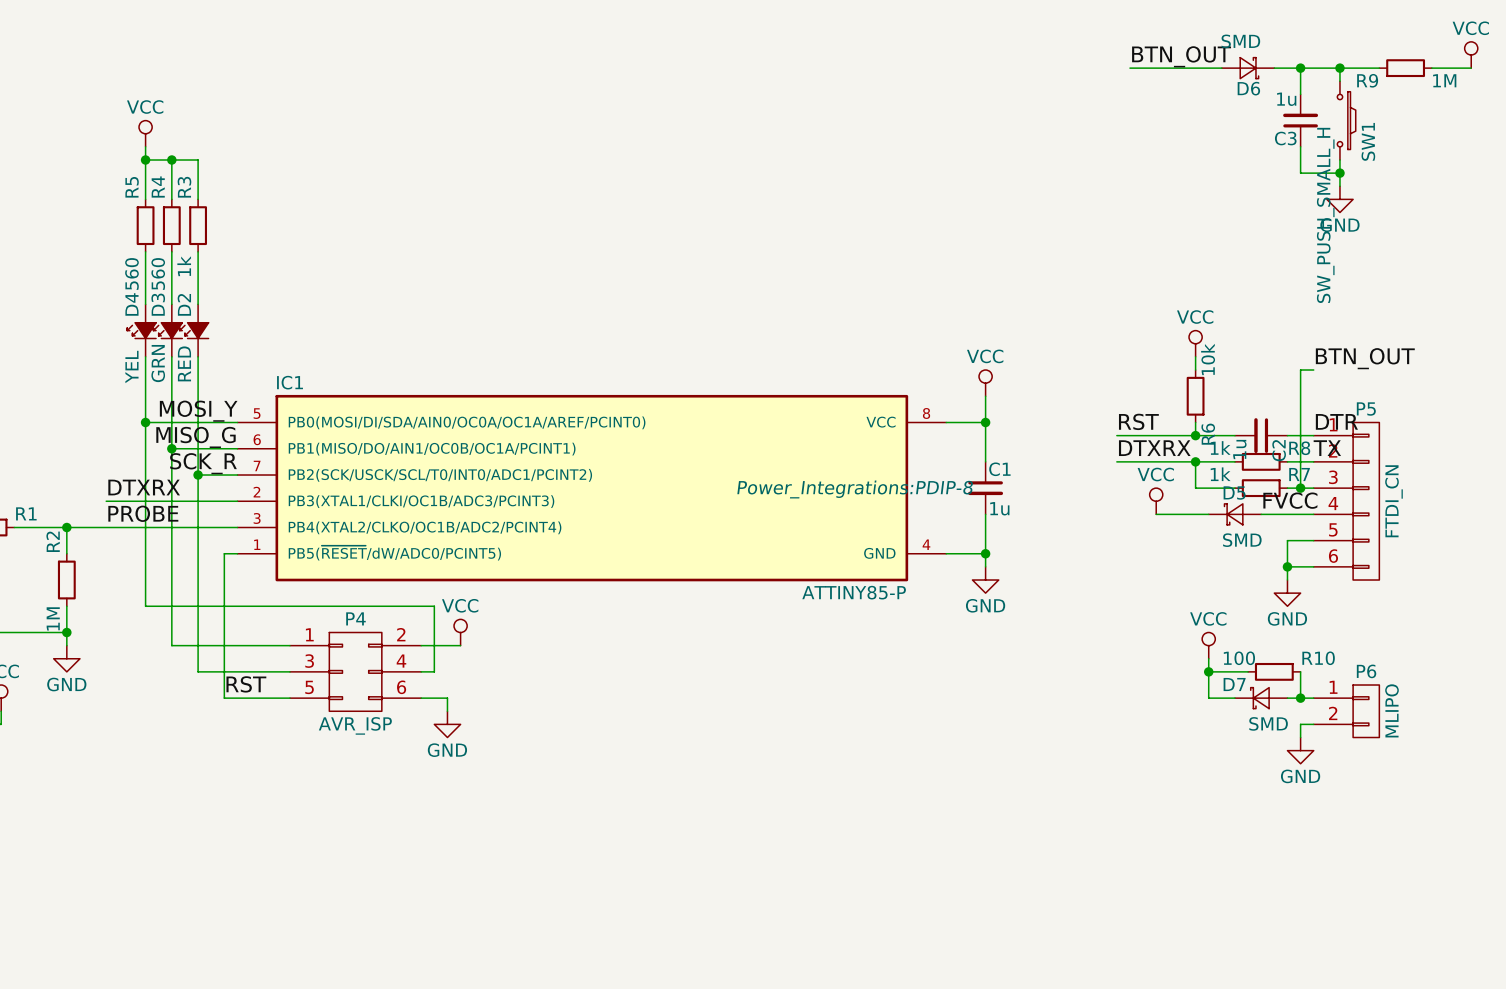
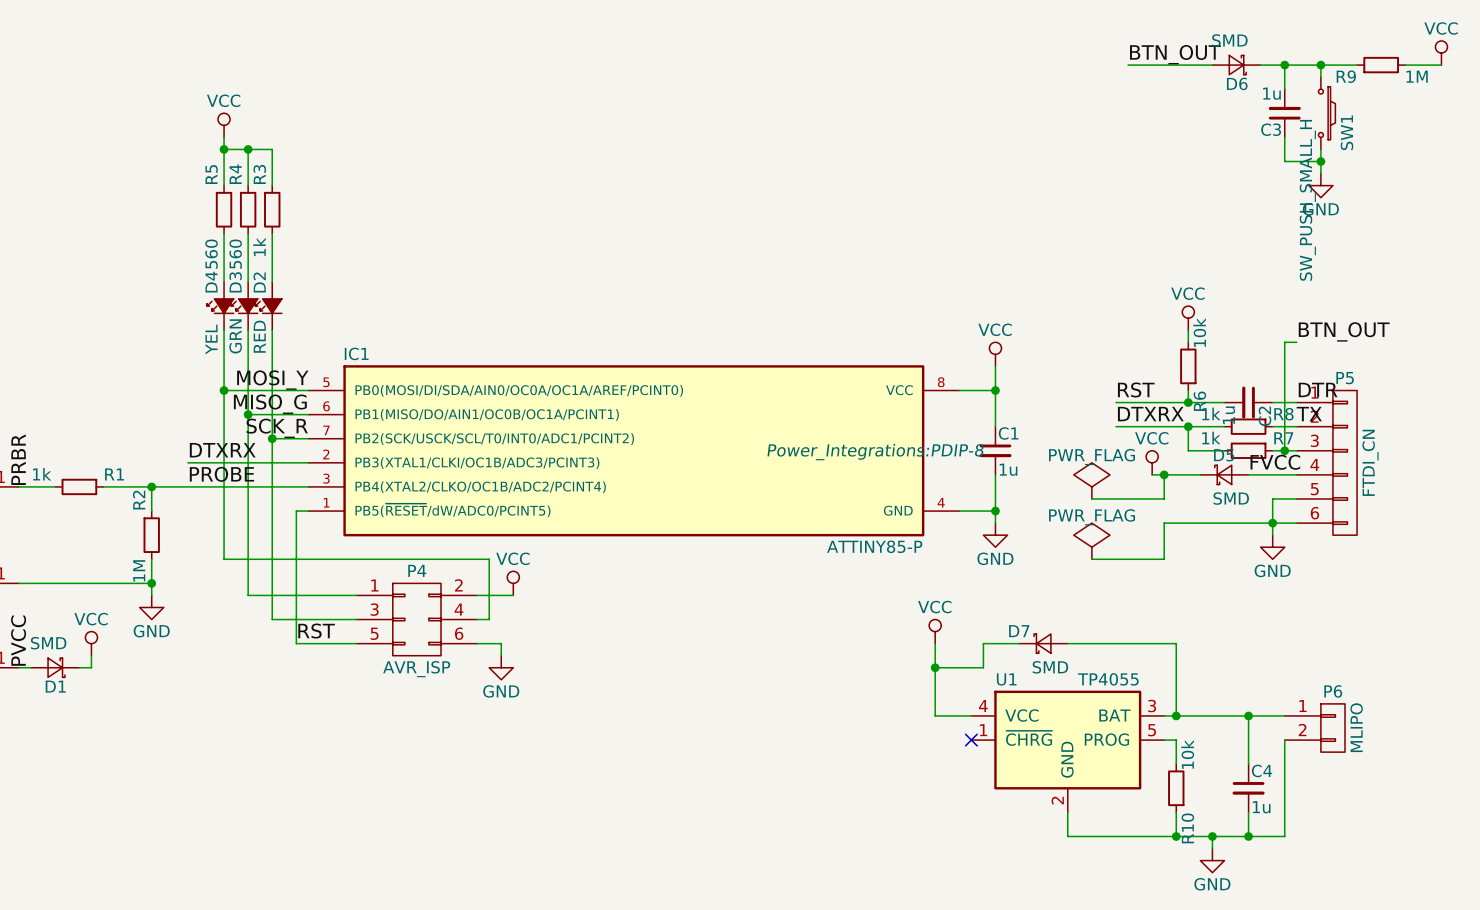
wire: none -> (1164, 474) (1164, 499) (1091, 499)
junction: none -> (1164, 474)
power symbol: none -> PWR_FLAG (1091, 480)
wire: none -> (1272, 523) (1164, 523) (1164, 559) (1091, 559)
power symbol: none -> PWR_FLAG (1091, 541)
power symbol: VCC (1208, 645) -> none
wire: (1208, 658) (1208, 698) (1234, 698) -> none
R10 value: 100 (1239, 658) -> 10k (1187, 754)
wire: (1208, 671) (1248, 671) -> none
junction: (1208, 671) -> none
R10 rotation: 0° (1274, 671) -> 90° clockwise (1176, 788)
R10 position: (1274, 671) -> (1176, 788)
wire: (1300, 671) (1300, 698) -> (1248, 812) (1248, 836)
power symbol: none -> VCC (935, 631)
wire: none -> (935, 643) (935, 715) (971, 715)
wire: none -> (1019, 643) (983, 643) (983, 667) (935, 667)
wire: none -> (1067, 643) (1176, 643) (1176, 715)
D7 position: (1261, 698) -> (1043, 643)
wire: (1287, 698) (1313, 698) -> none
junction: (1300, 698) -> none
P6 position: (1346, 711) -> (1314, 728)
junction: none -> (935, 667)
wire: (1313, 724) (1300, 724) (1300, 737) -> none
power symbol position: GND (1300, 750) -> GND (1212, 860)
wire: none -> (1164, 715) (1284, 715)
junction: none -> (1176, 715)
wire: none -> (1248, 715) (1248, 764)
junction: none -> (1248, 715)
no-connect mark: none -> (971, 740)
wire: none -> (1164, 740) (1176, 740) (1176, 764)
wire: none -> (1284, 740) (1284, 836) (1067, 836) (1067, 812)
U1: none -> TP4055 (1067, 751)
C4: none -> 1u (1248, 788)
wire: none -> (1176, 812) (1176, 836)
junction: none -> (1176, 836)
wire: none -> (1212, 836) (1212, 848)
junction: none -> (1212, 836)
junction: none -> (1248, 836)

